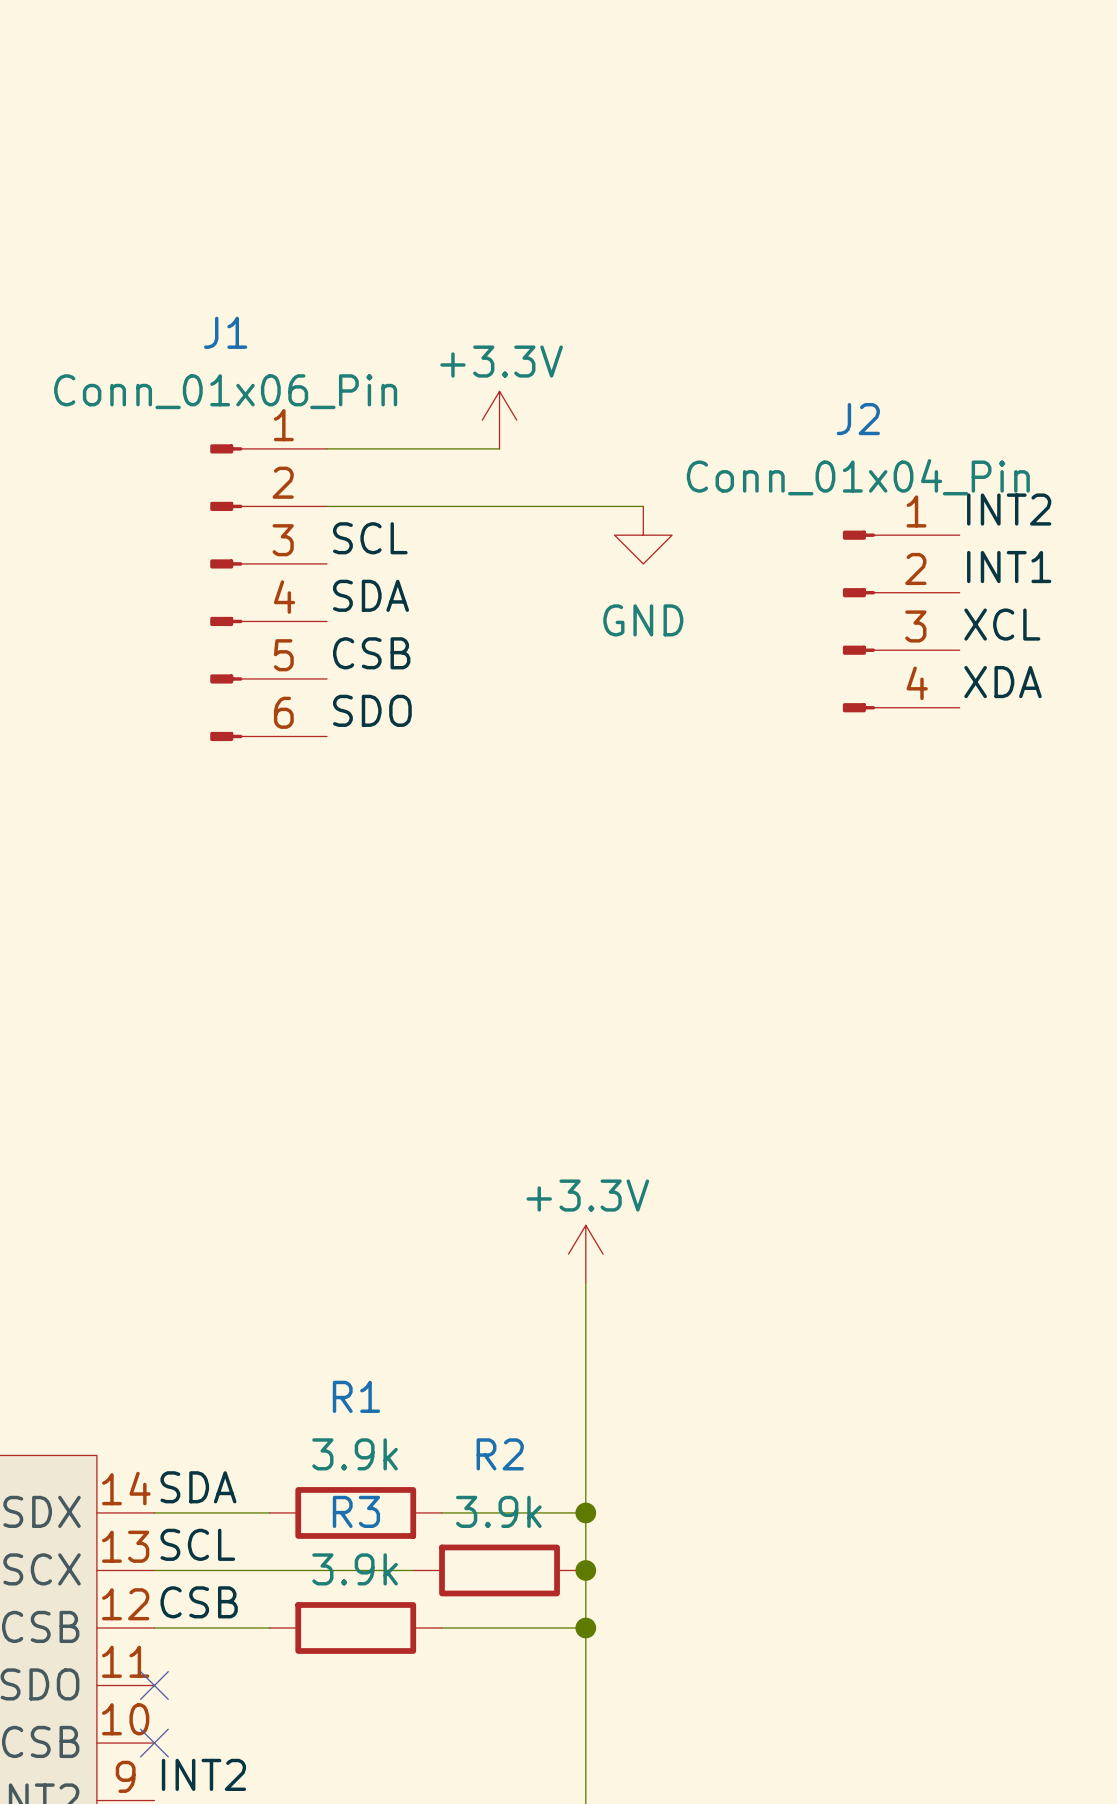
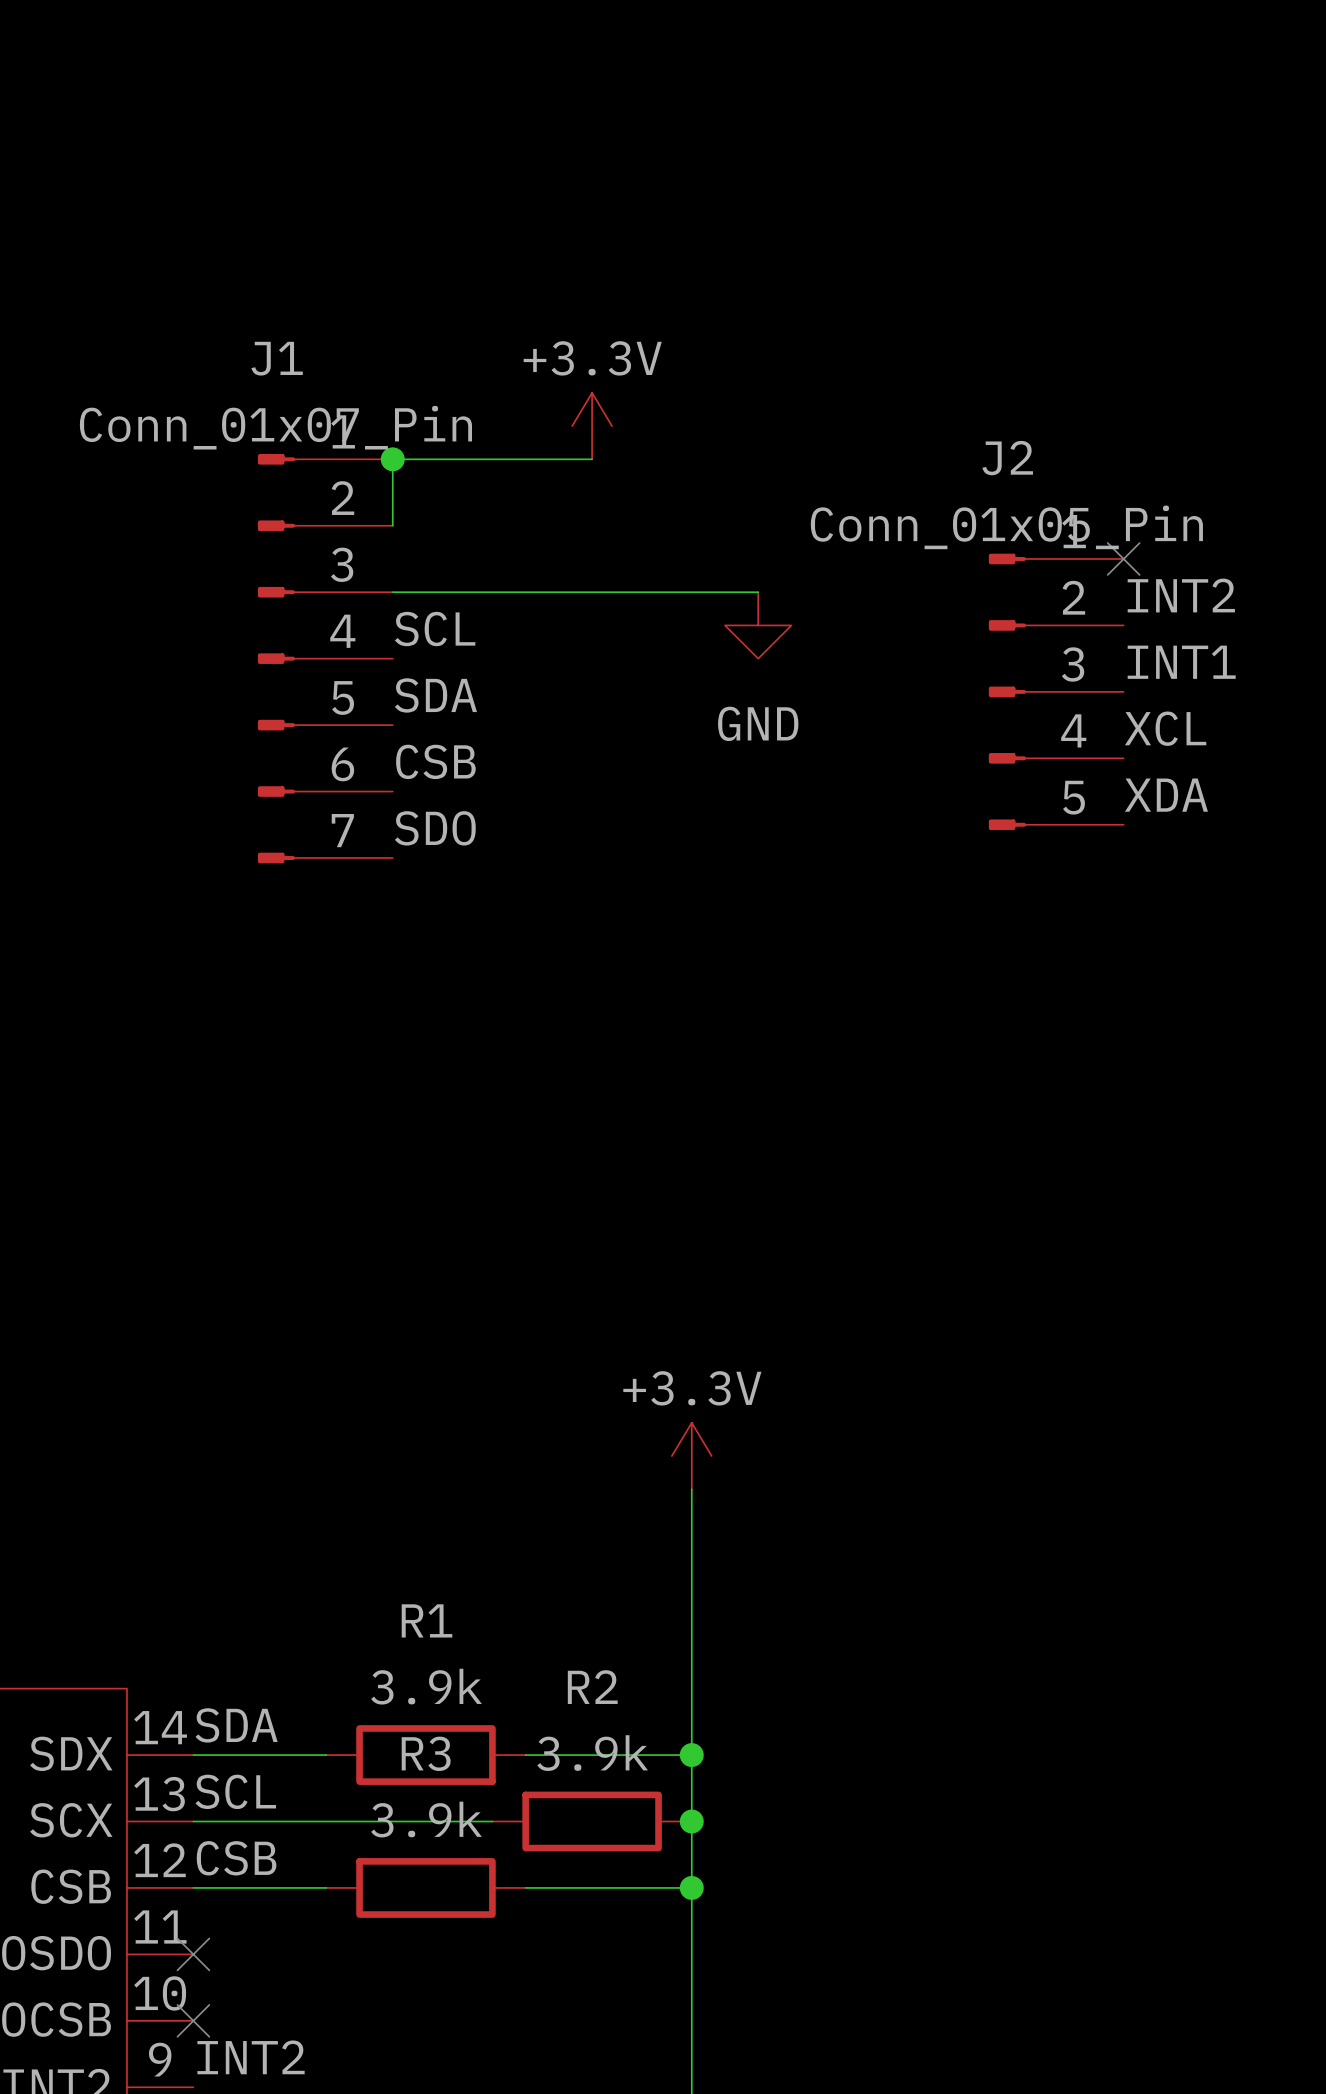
J1 value: Conn_01x06_Pin (225, 391) -> Conn_01x07_Pin (275, 427)
junction: none -> (392, 459)
power symbol position: +3.3V (499, 420) -> +3.3V (592, 426)
J1 symbol: [210, 444, 327, 742] -> [257, 454, 393, 864]
wire: (326, 448) (499, 448) -> (392, 525) (392, 459) (592, 459)
J2 value: Conn_01x04_Pin (858, 477) -> Conn_01x05_Pin (1006, 527)
no-connect mark: none -> (1123, 558)
J2 symbol: [842, 530, 960, 713] -> [988, 553, 1124, 831]

